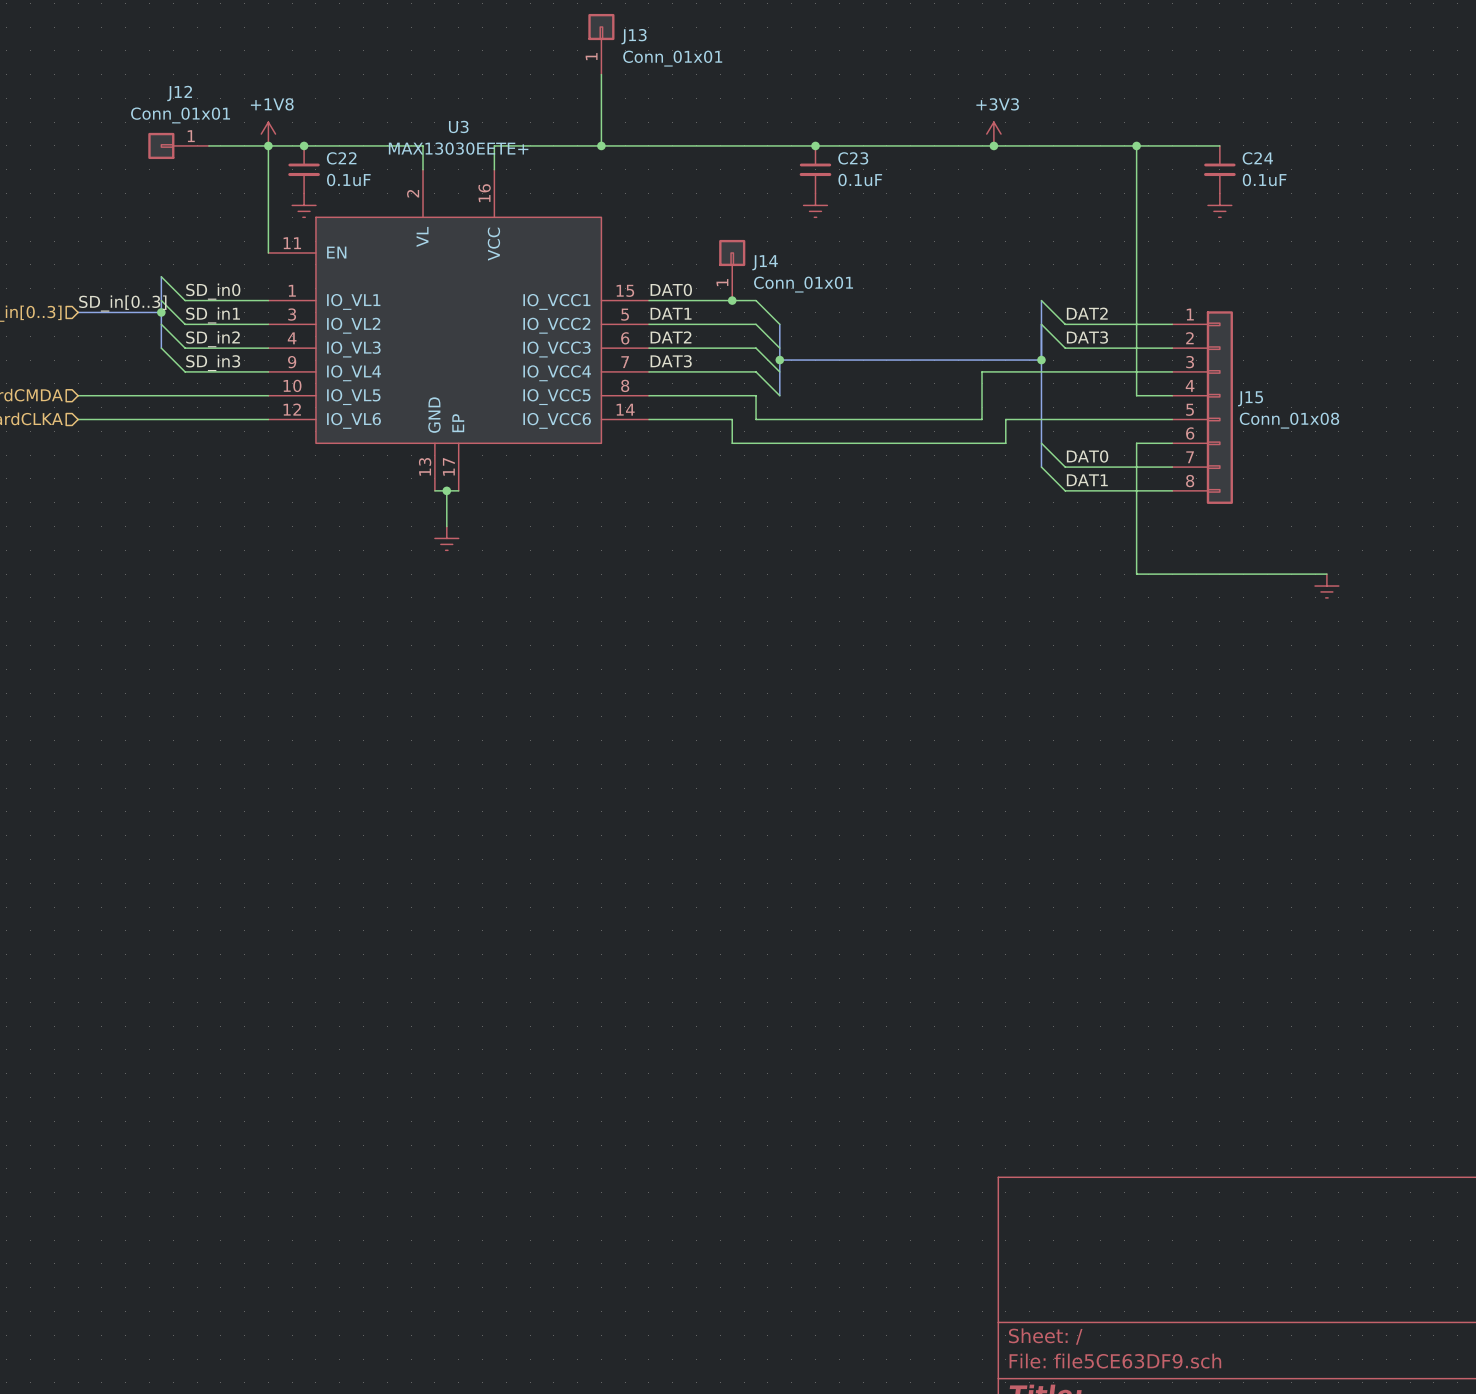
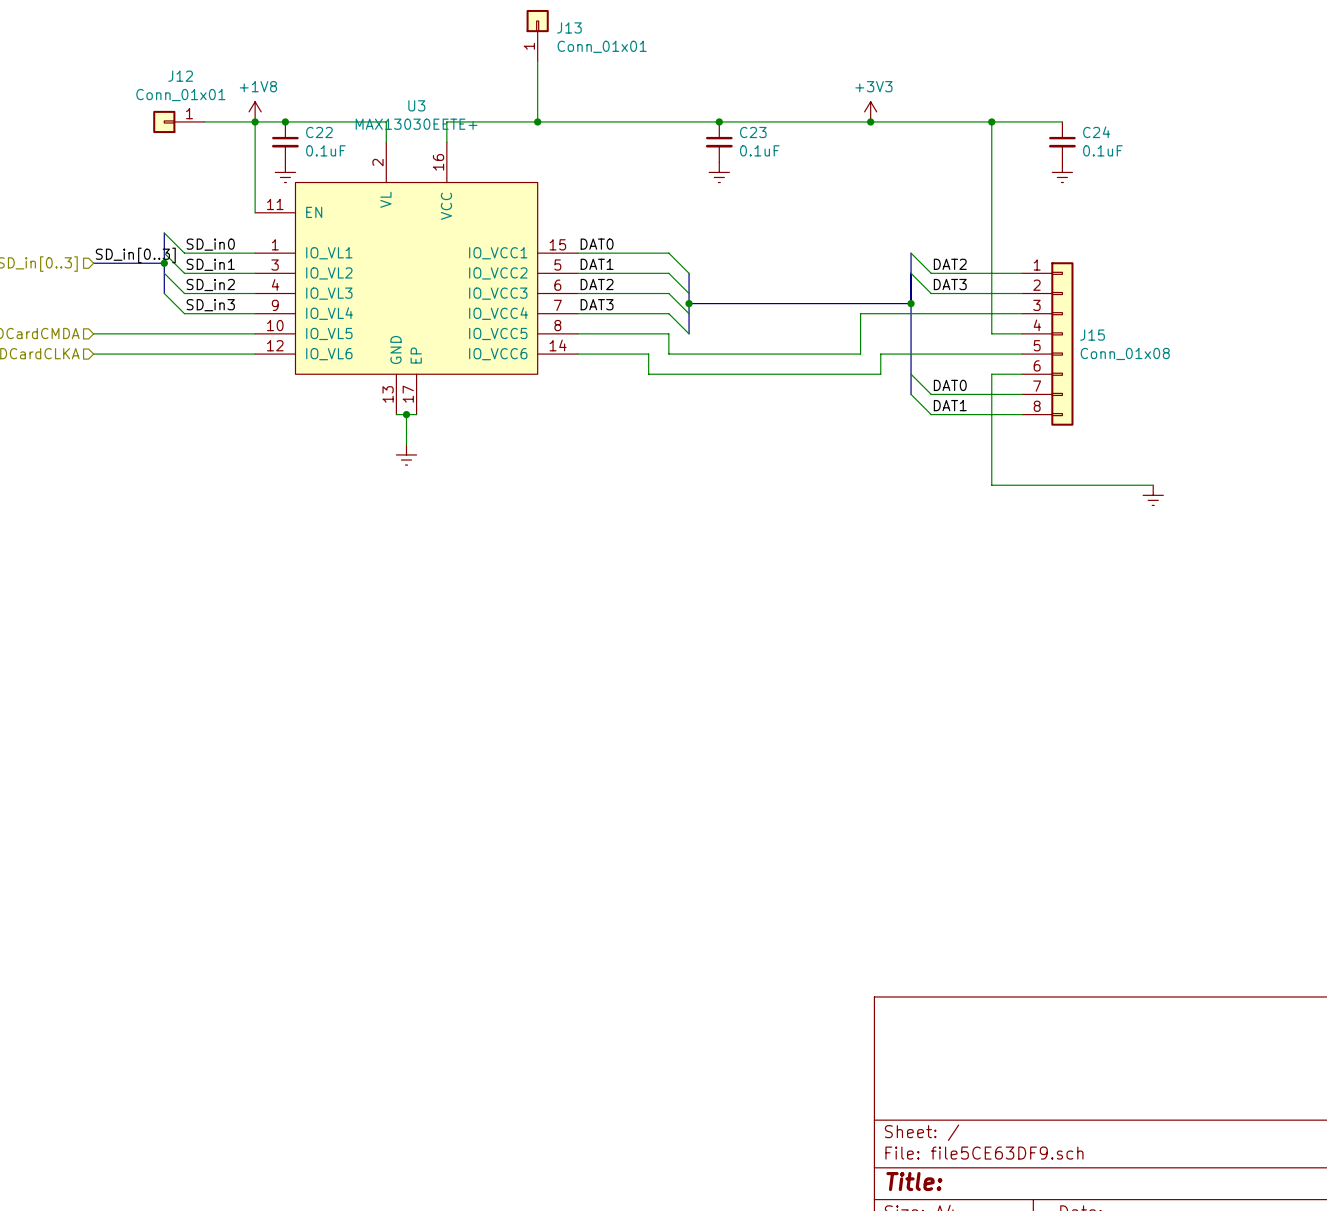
J14: Conn_01x01 (732, 270) -> none
junction: (732, 300) -> none

